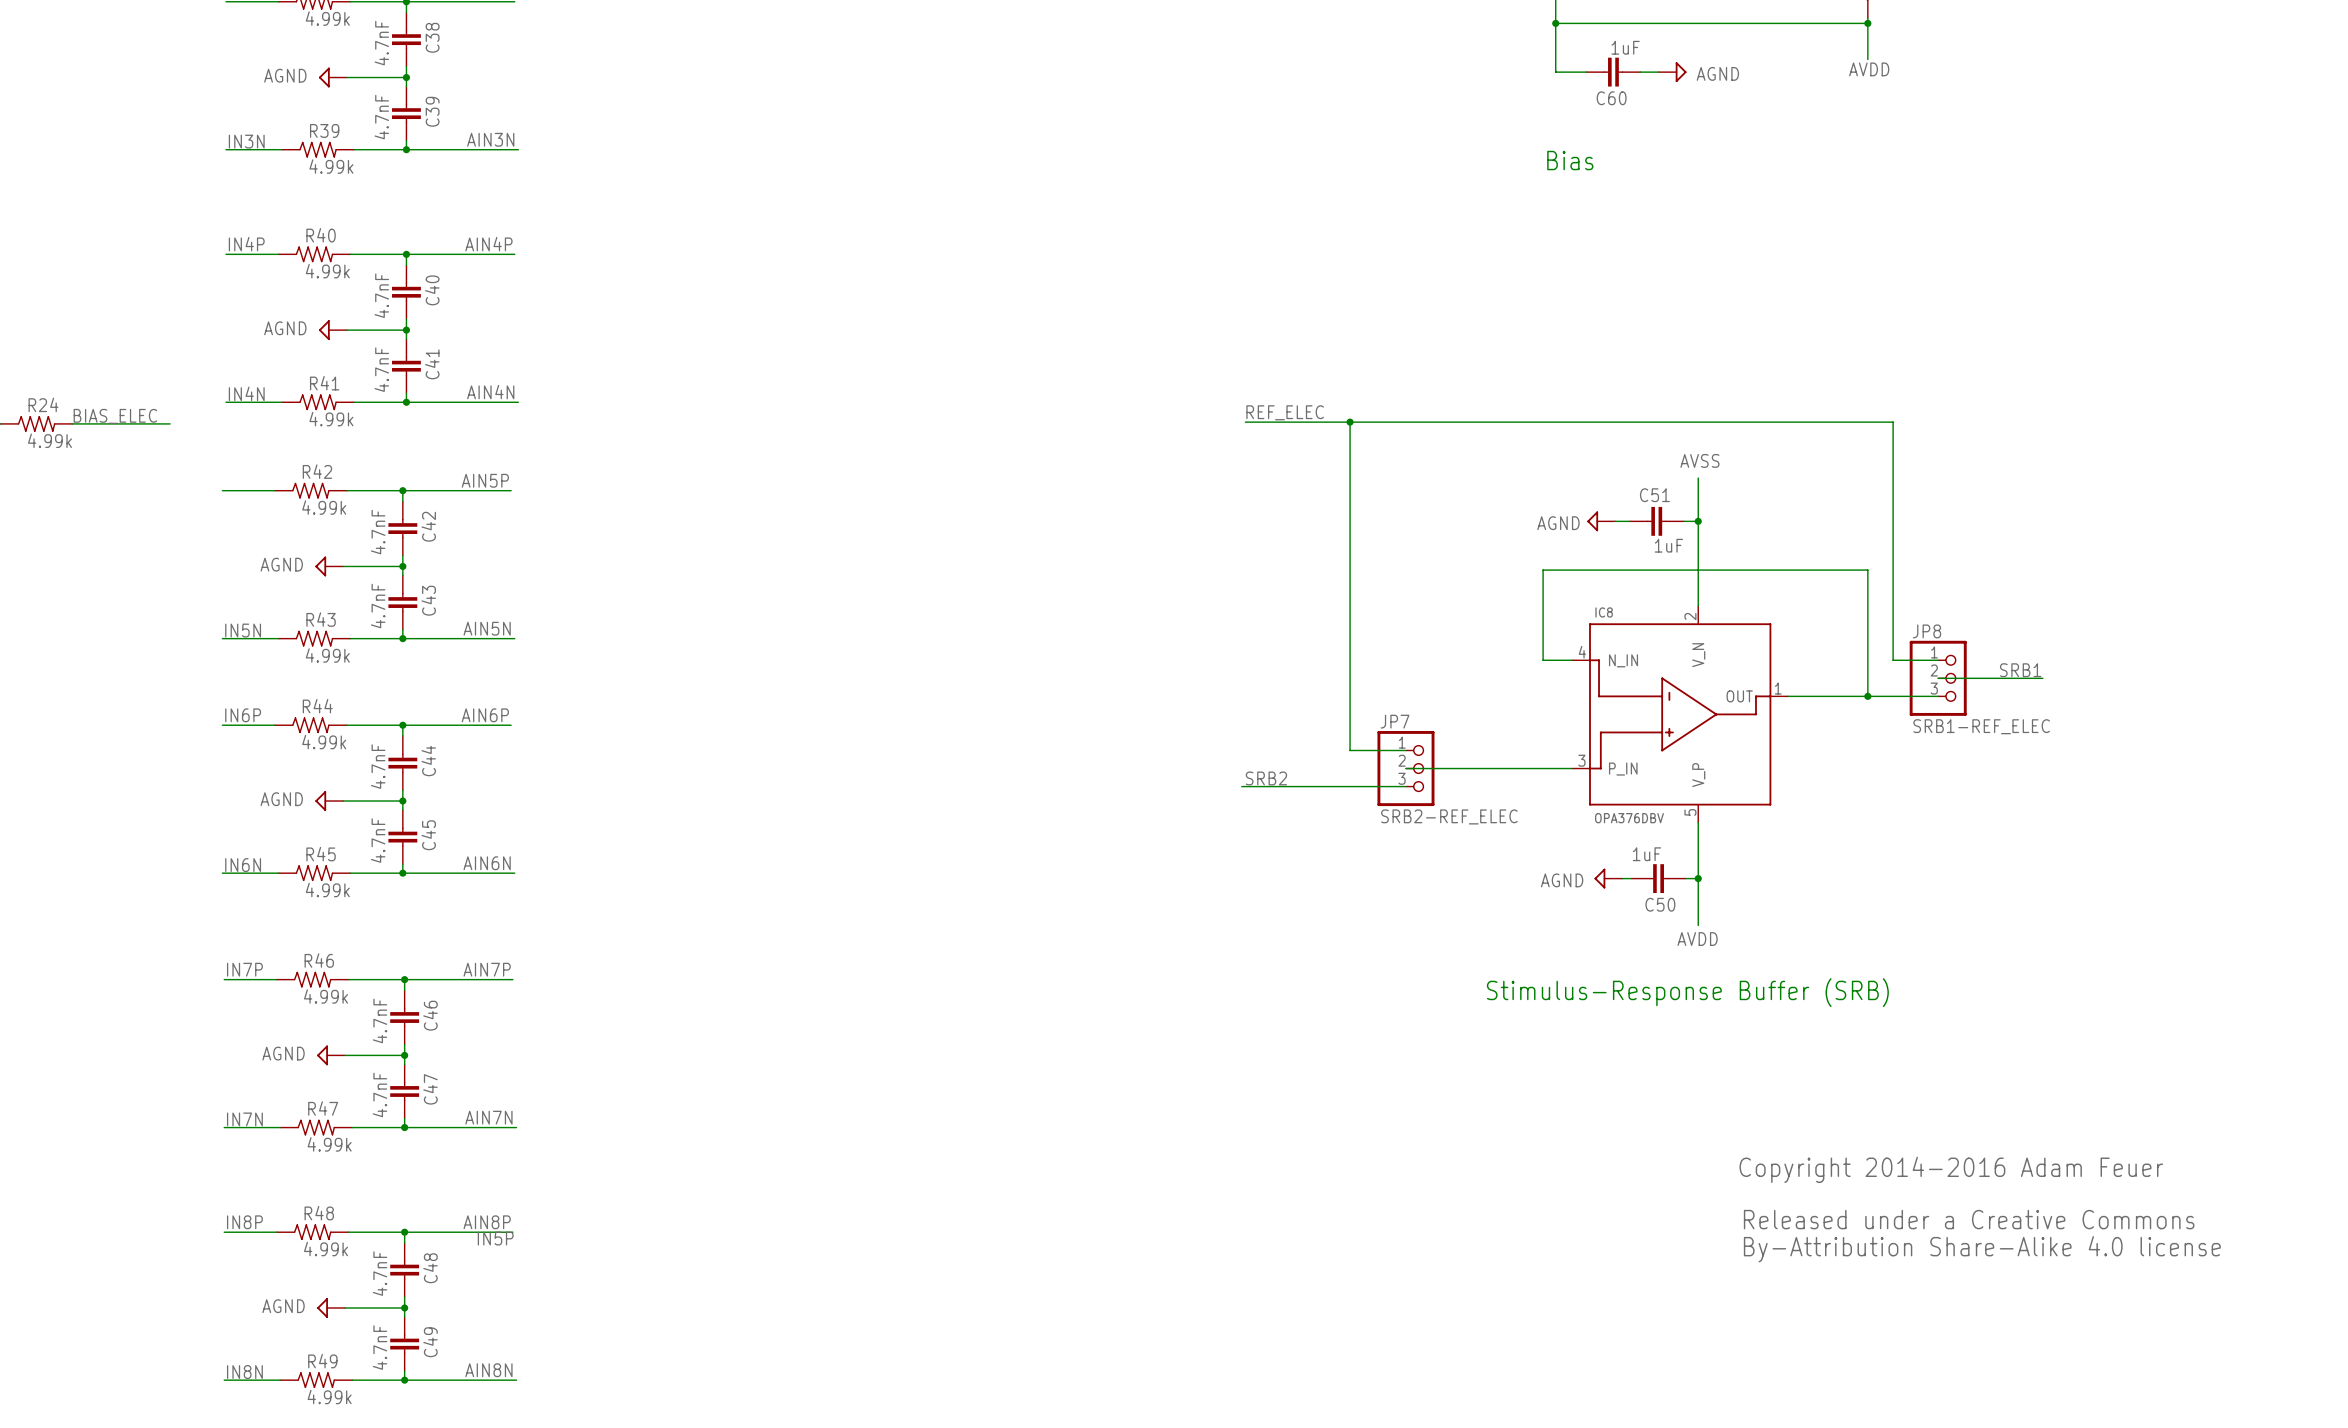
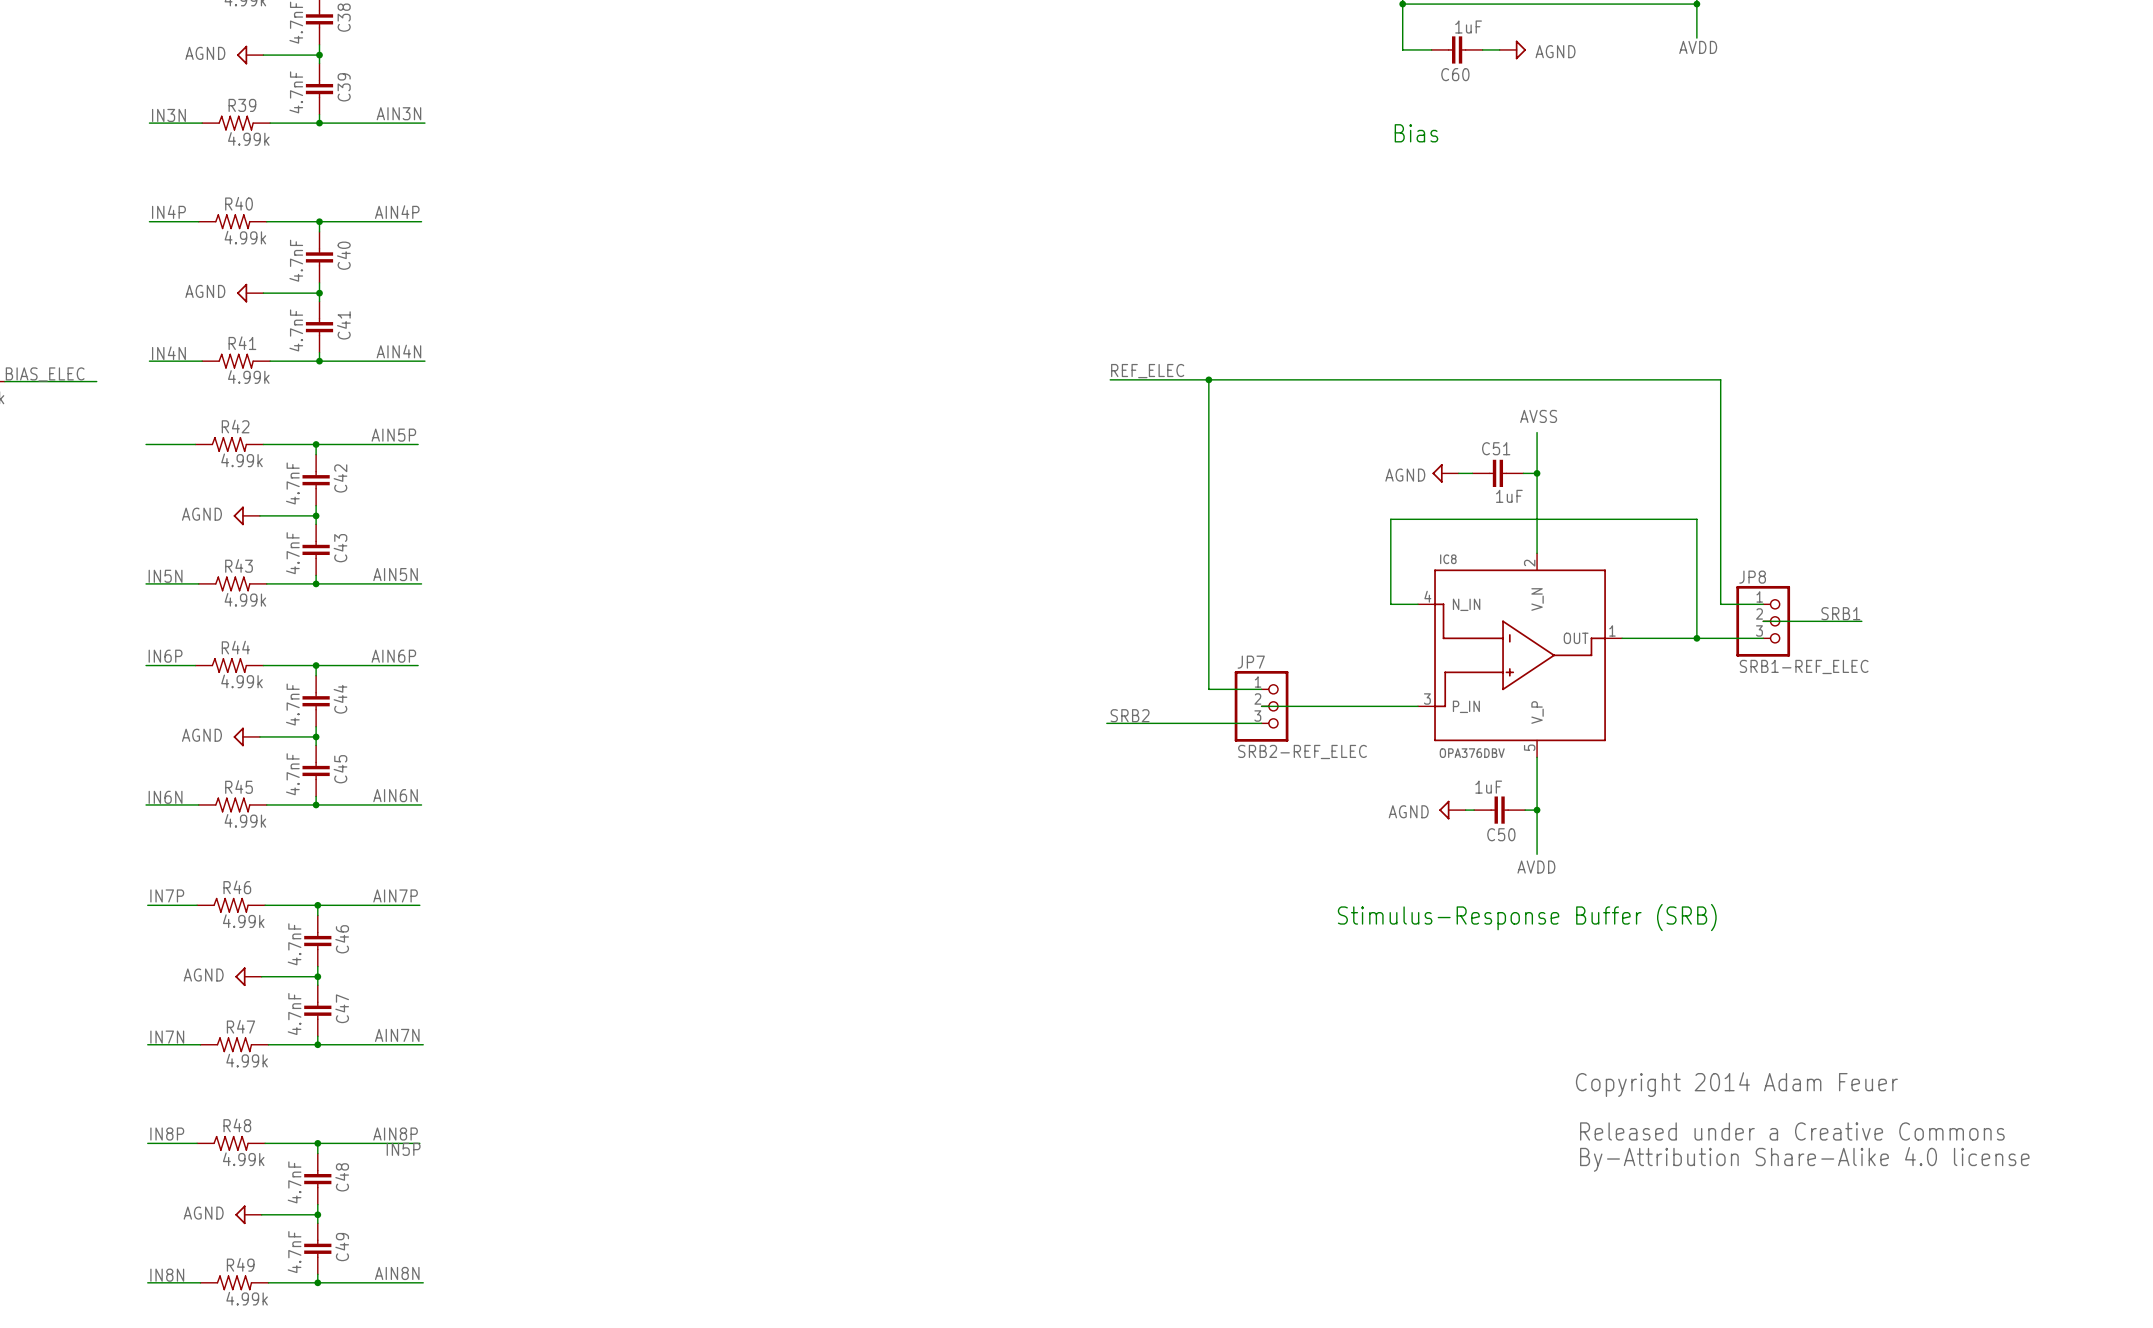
text: Copyright 2014-2016 Adam Feuer (1951, 1169) -> Copyright 2014 Adam Feuer (1736, 1084)

